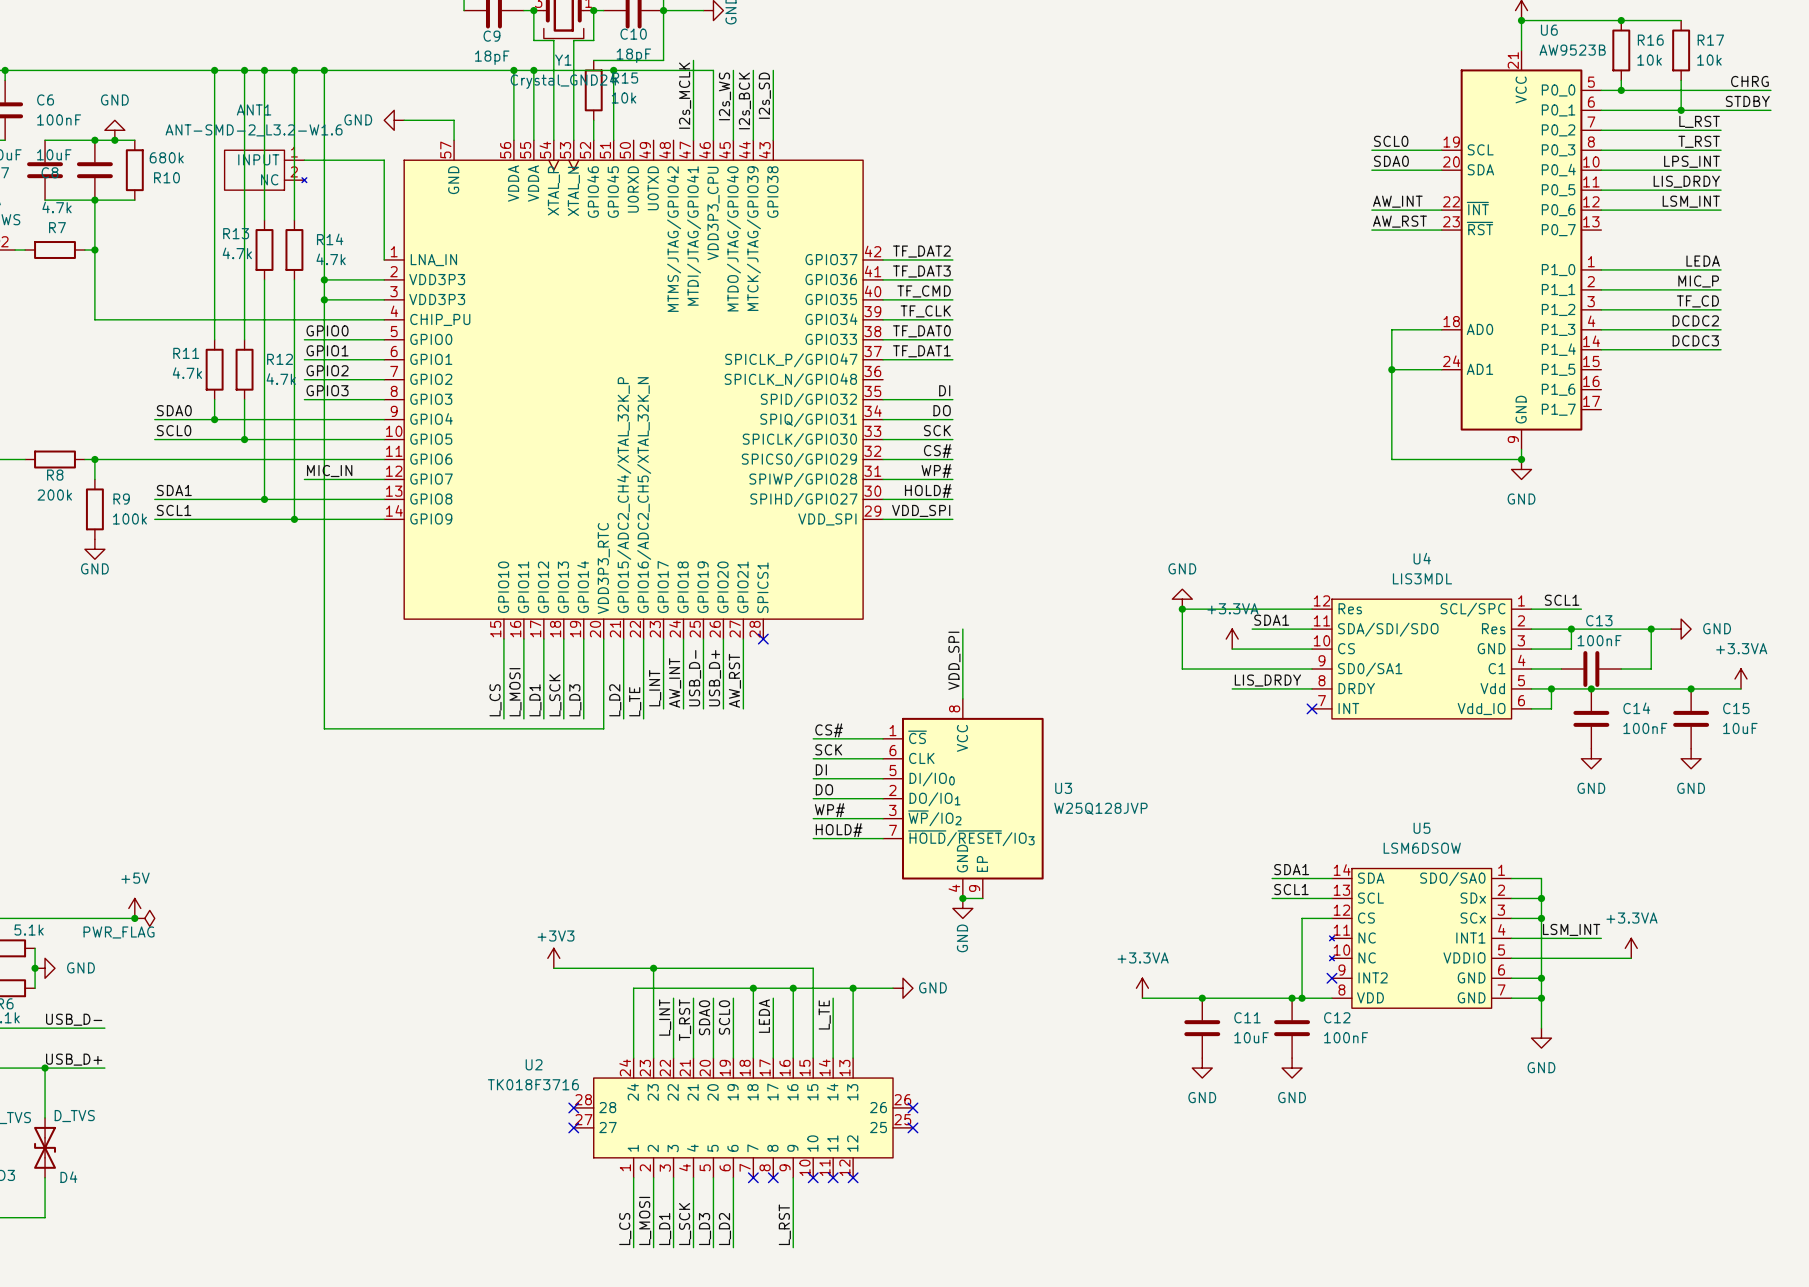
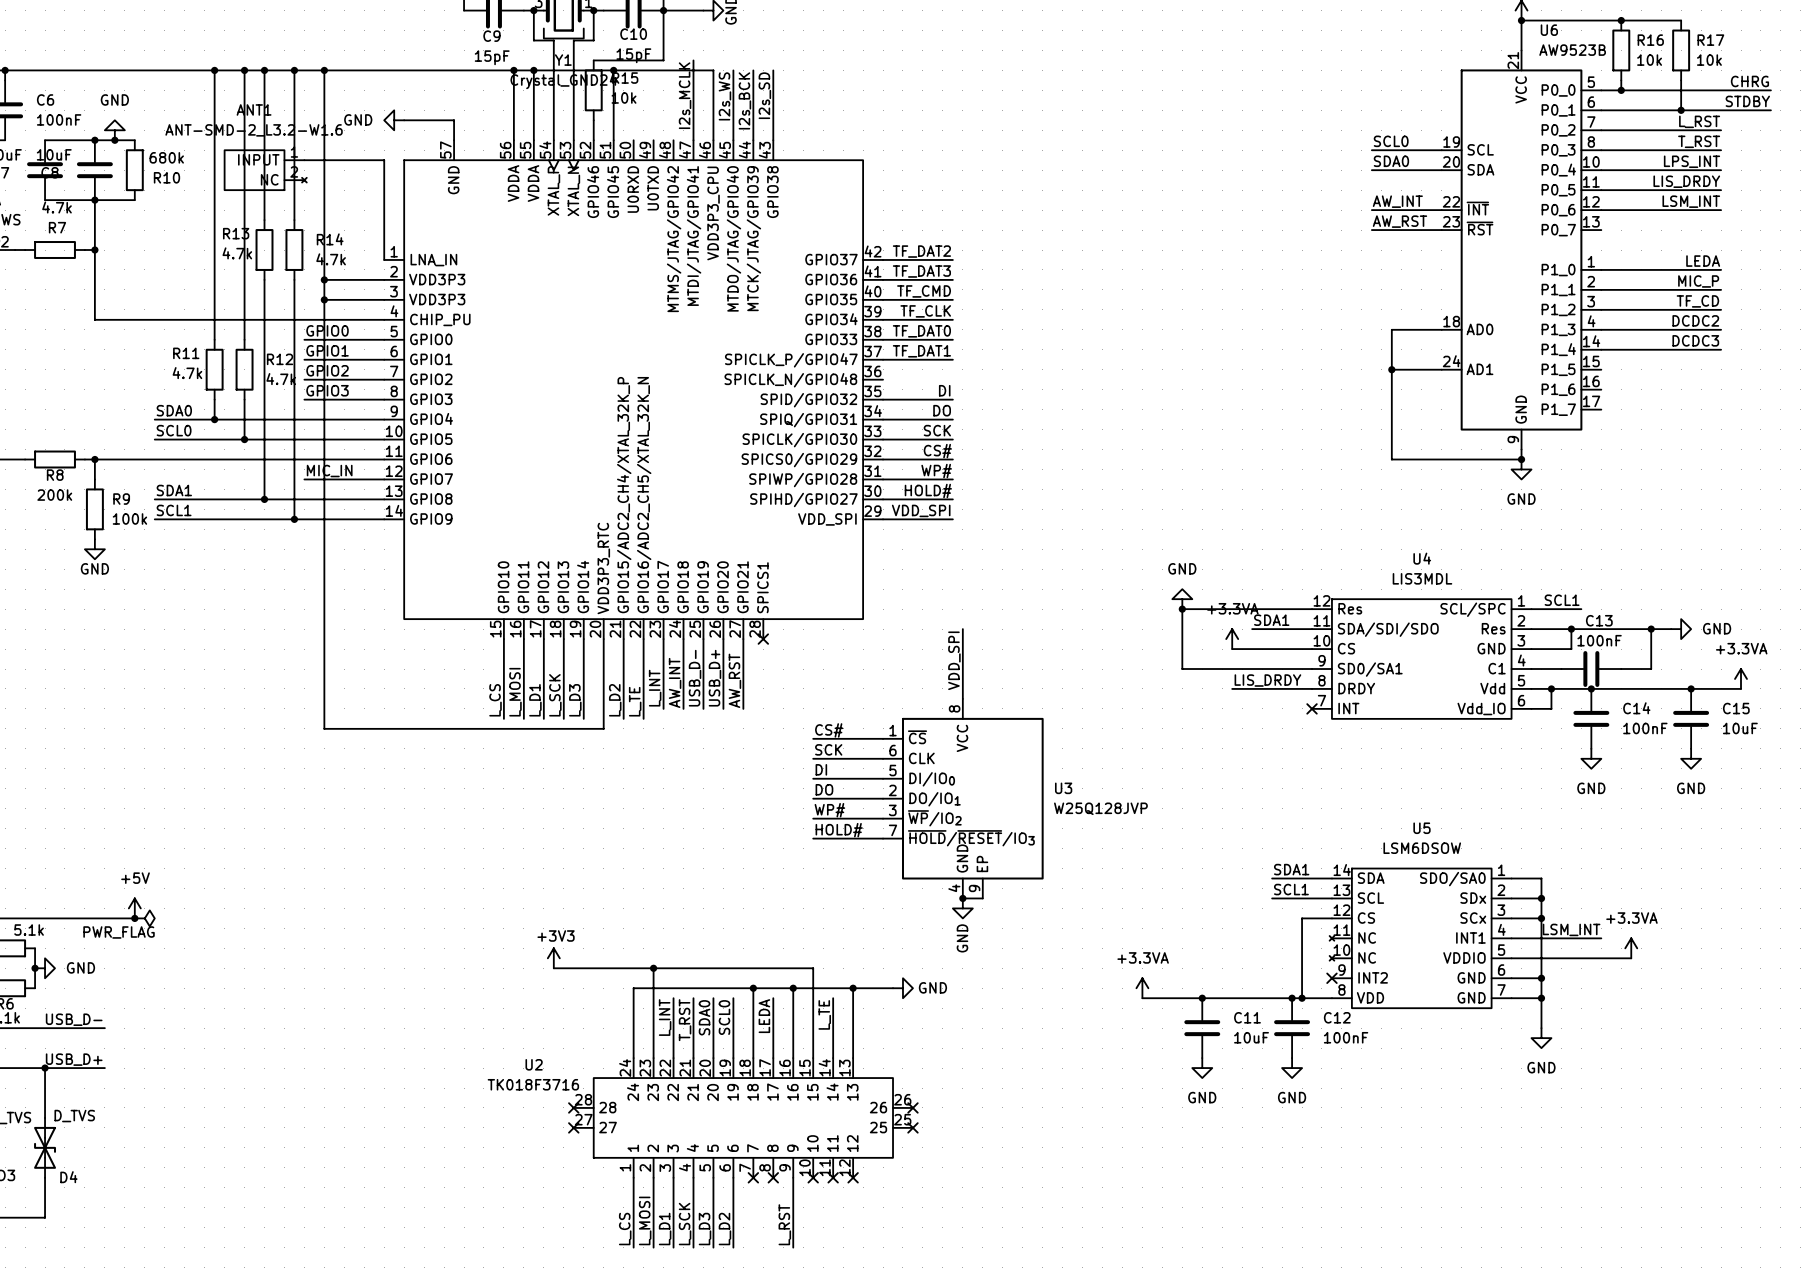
C10 value: 18pF (633, 55) -> 15pF (633, 55)
C9 value: 18pF (492, 57) -> 15pF (492, 57)

